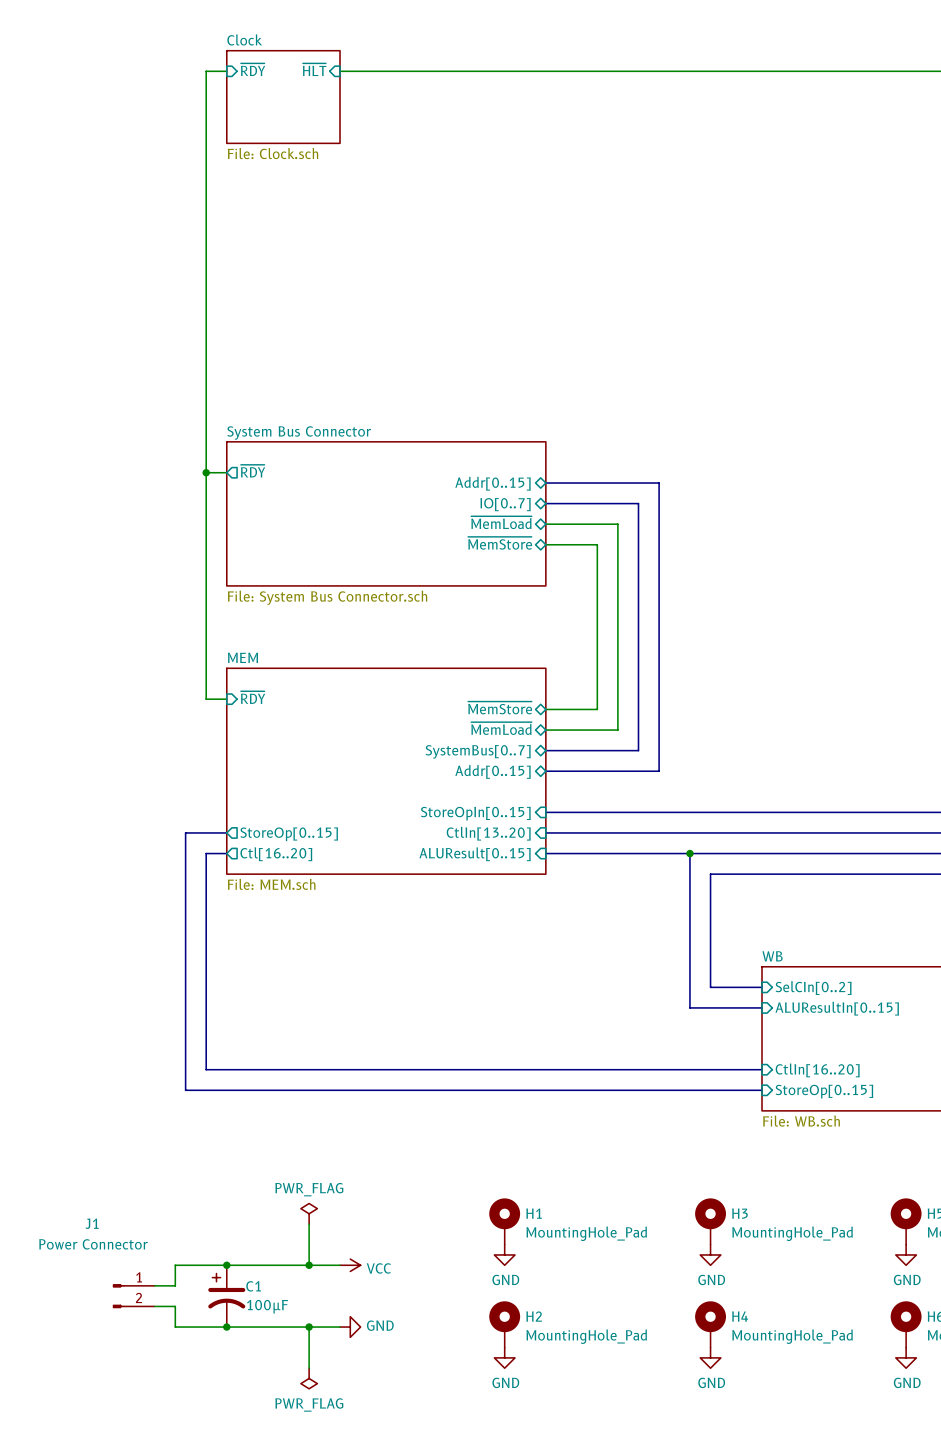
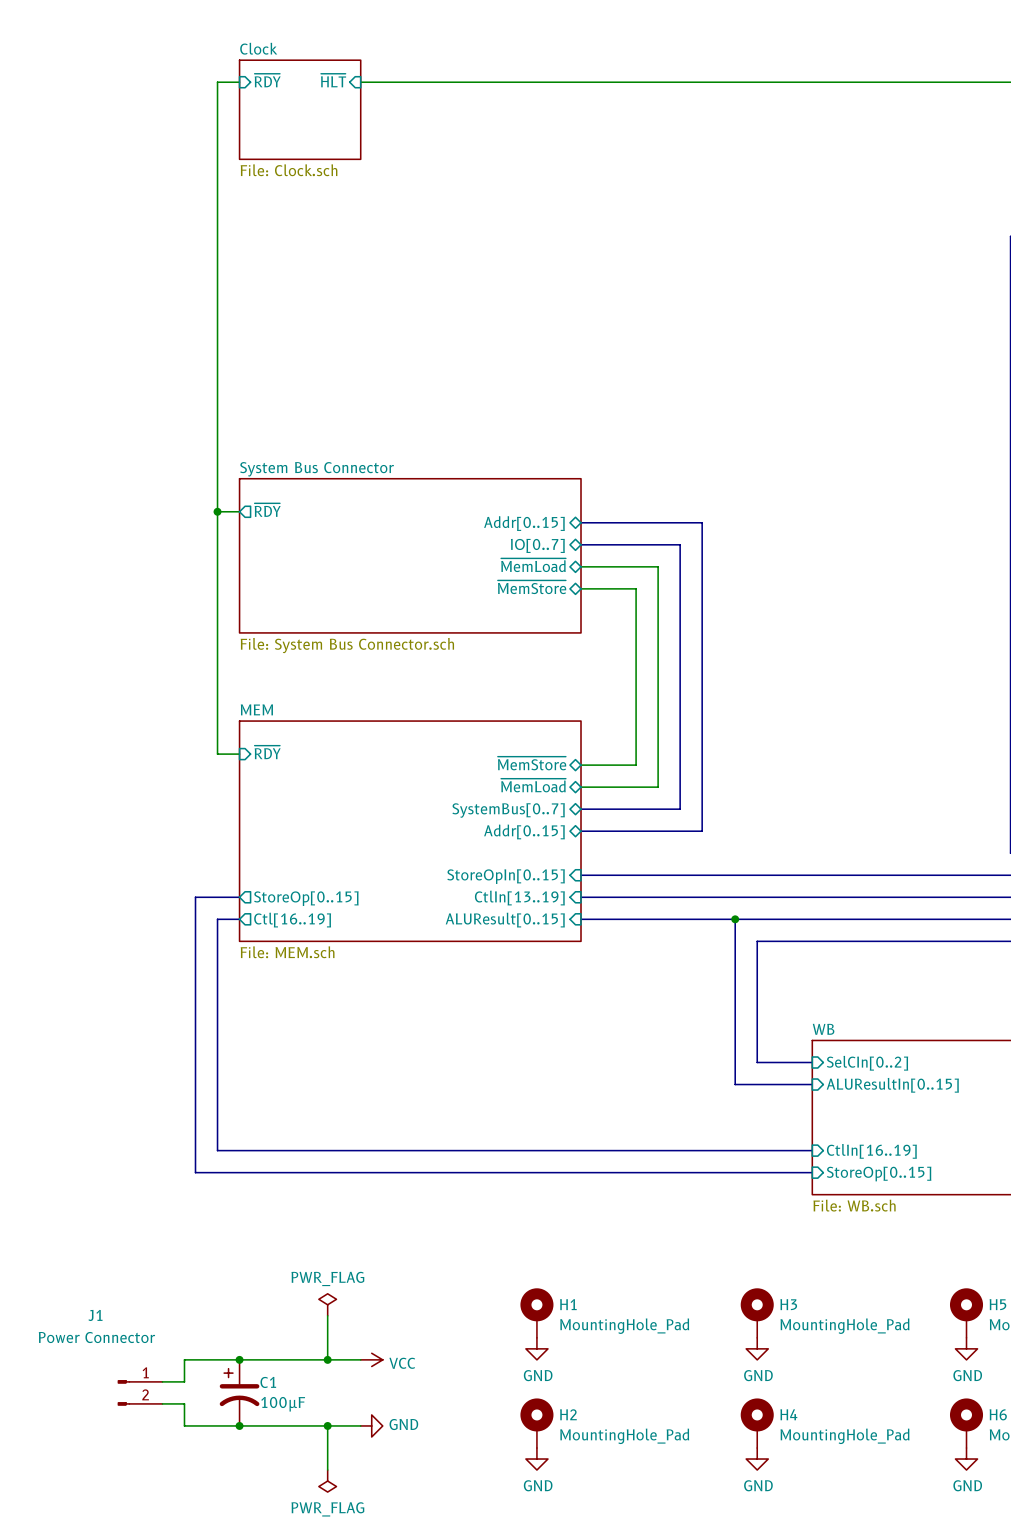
sheet pin: CtlIn[13..20] (488, 833) -> CtlIn[13..19] (519, 898)
sheet pin: Ctl[16..20] (276, 854) -> Ctl[16..19] (292, 920)
sheet pin: CtlIn[16..20] (817, 1070) -> CtlIn[16..19] (871, 1151)

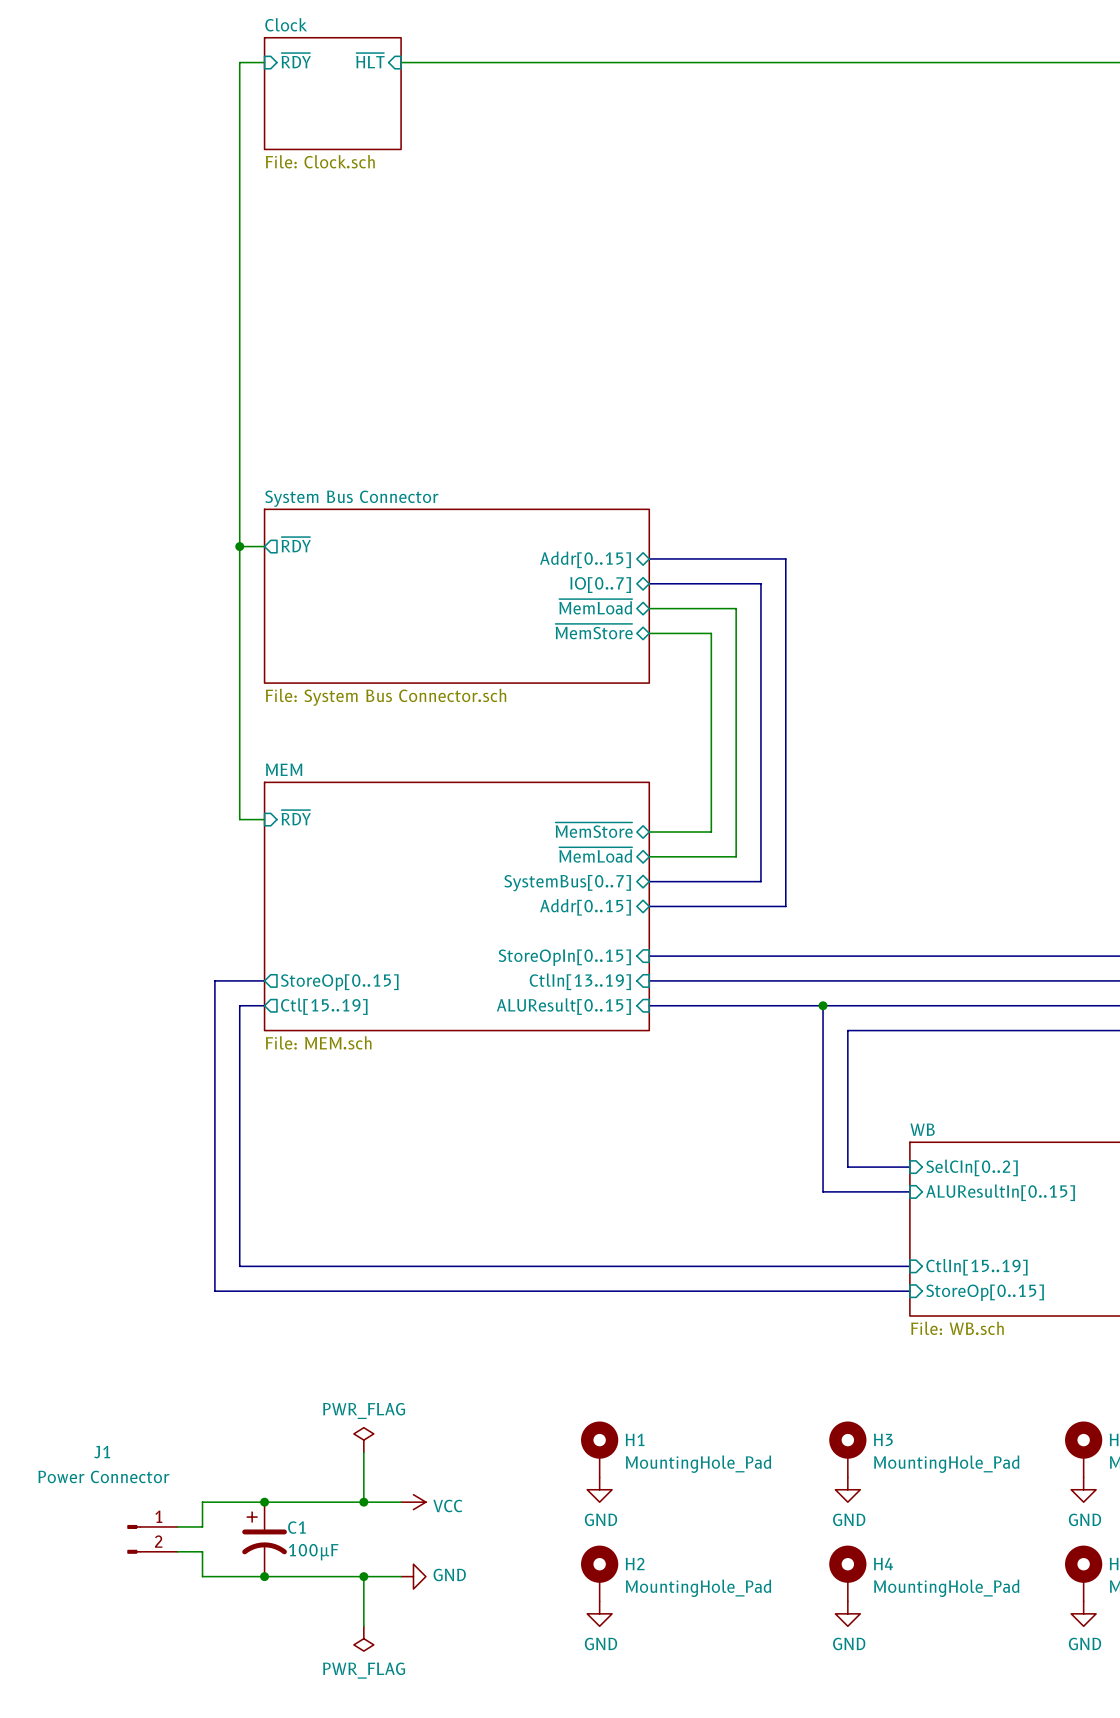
sheet pin: Ctl[16..19] (292, 920) -> Ctl[15..19] (324, 1006)
sheet pin: CtlIn[16..19] (871, 1151) -> CtlIn[15..19] (977, 1267)

